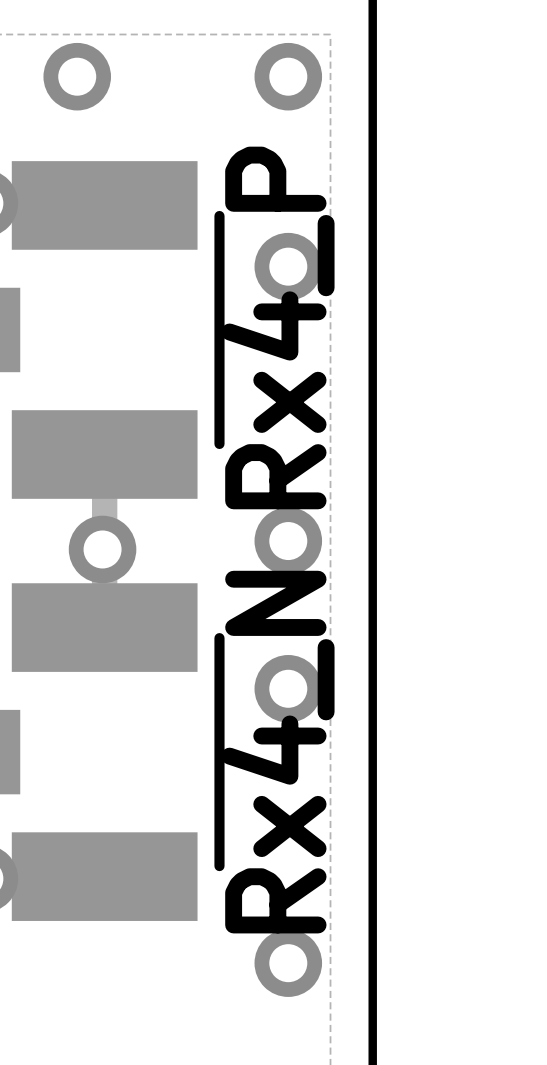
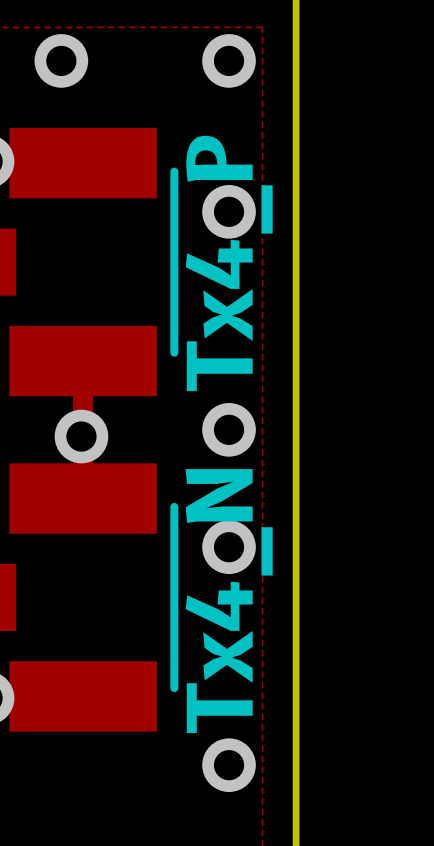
part value: Rx4_P (277, 327) -> Tx4_P (229, 263)
part value: Rx4_N (277, 752) -> Tx4_N (229, 601)

